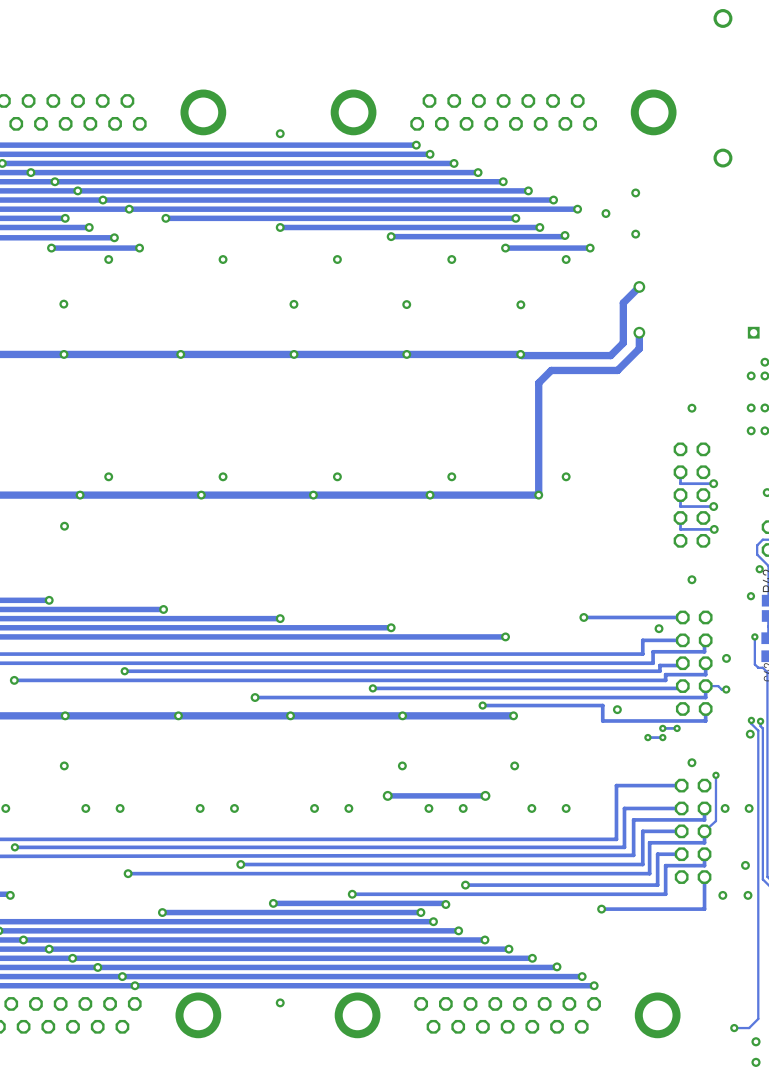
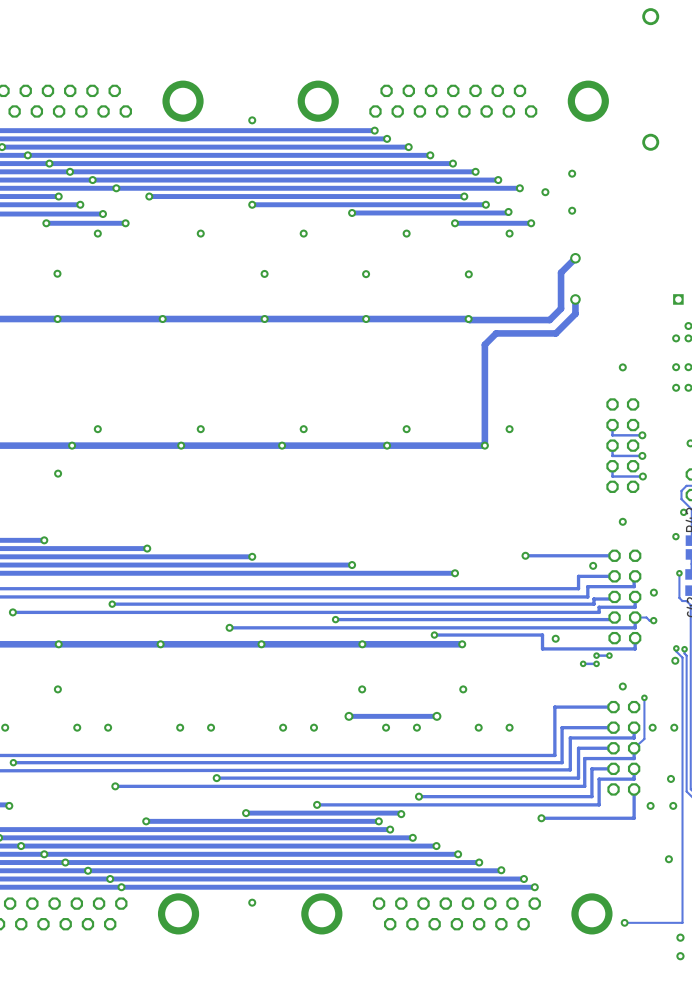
via: none -> (668, 859)
track: (758, 1018) (749, 1028) (734, 1028) -> (682, 917) (682, 922) (624, 922)
via: none -> (624, 922)
via: (734, 1028) -> none

